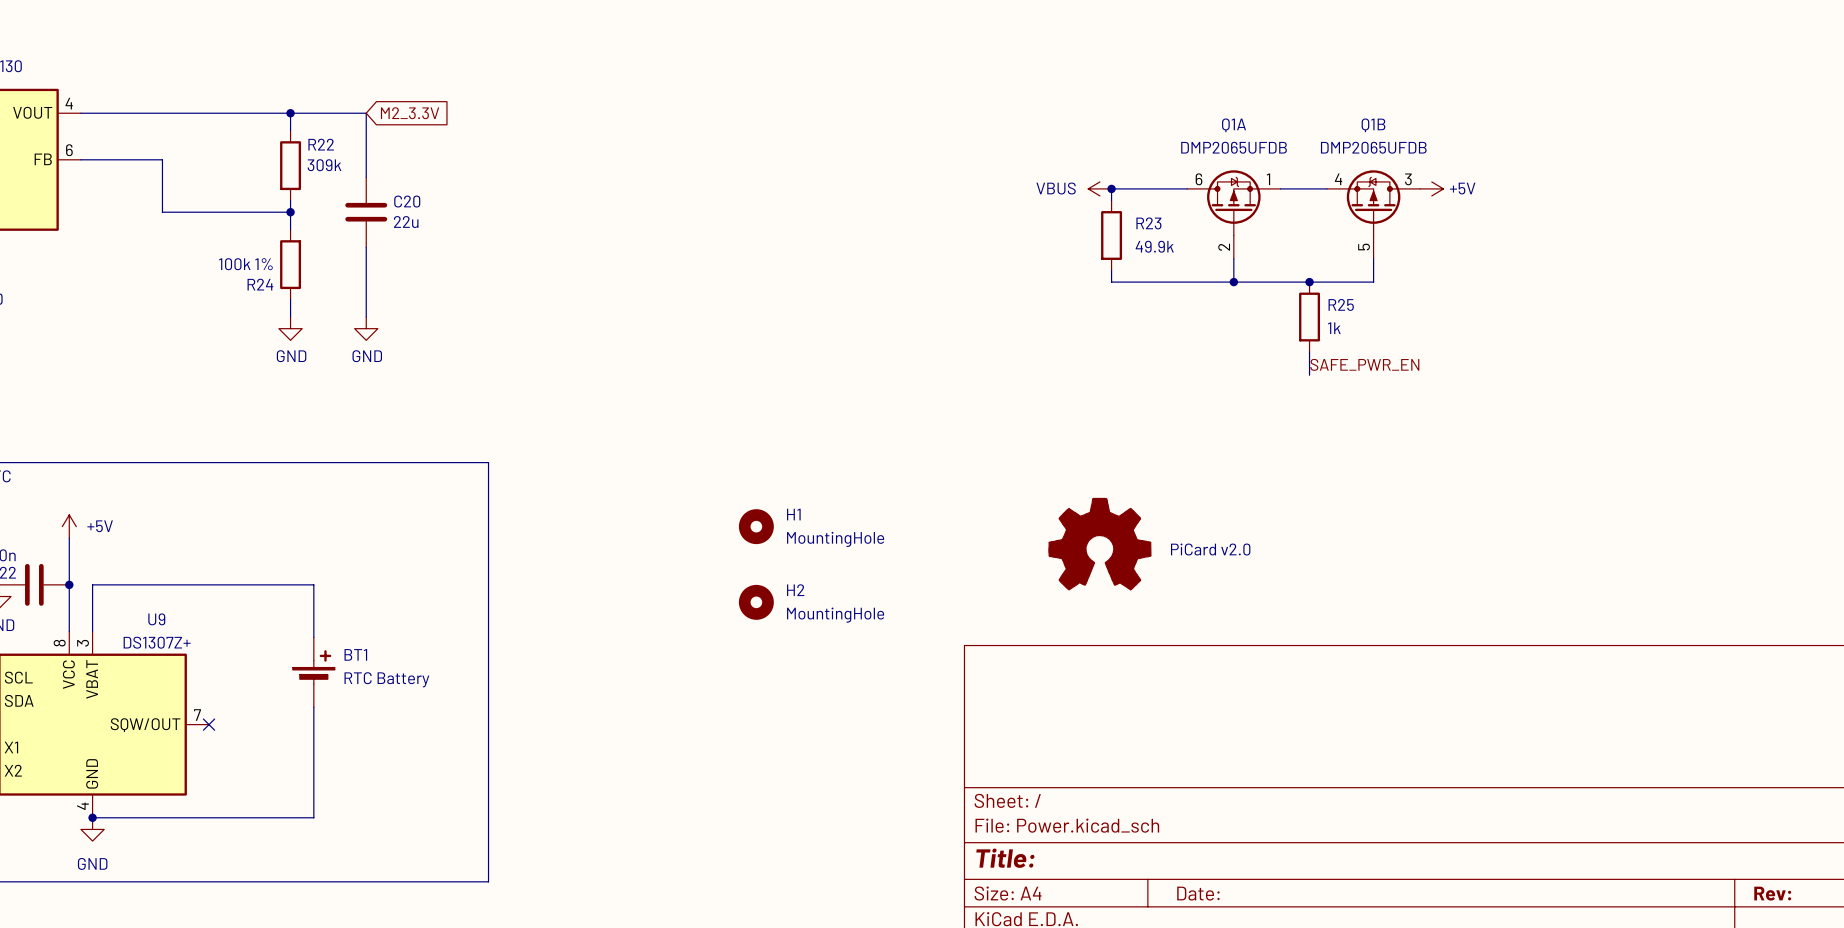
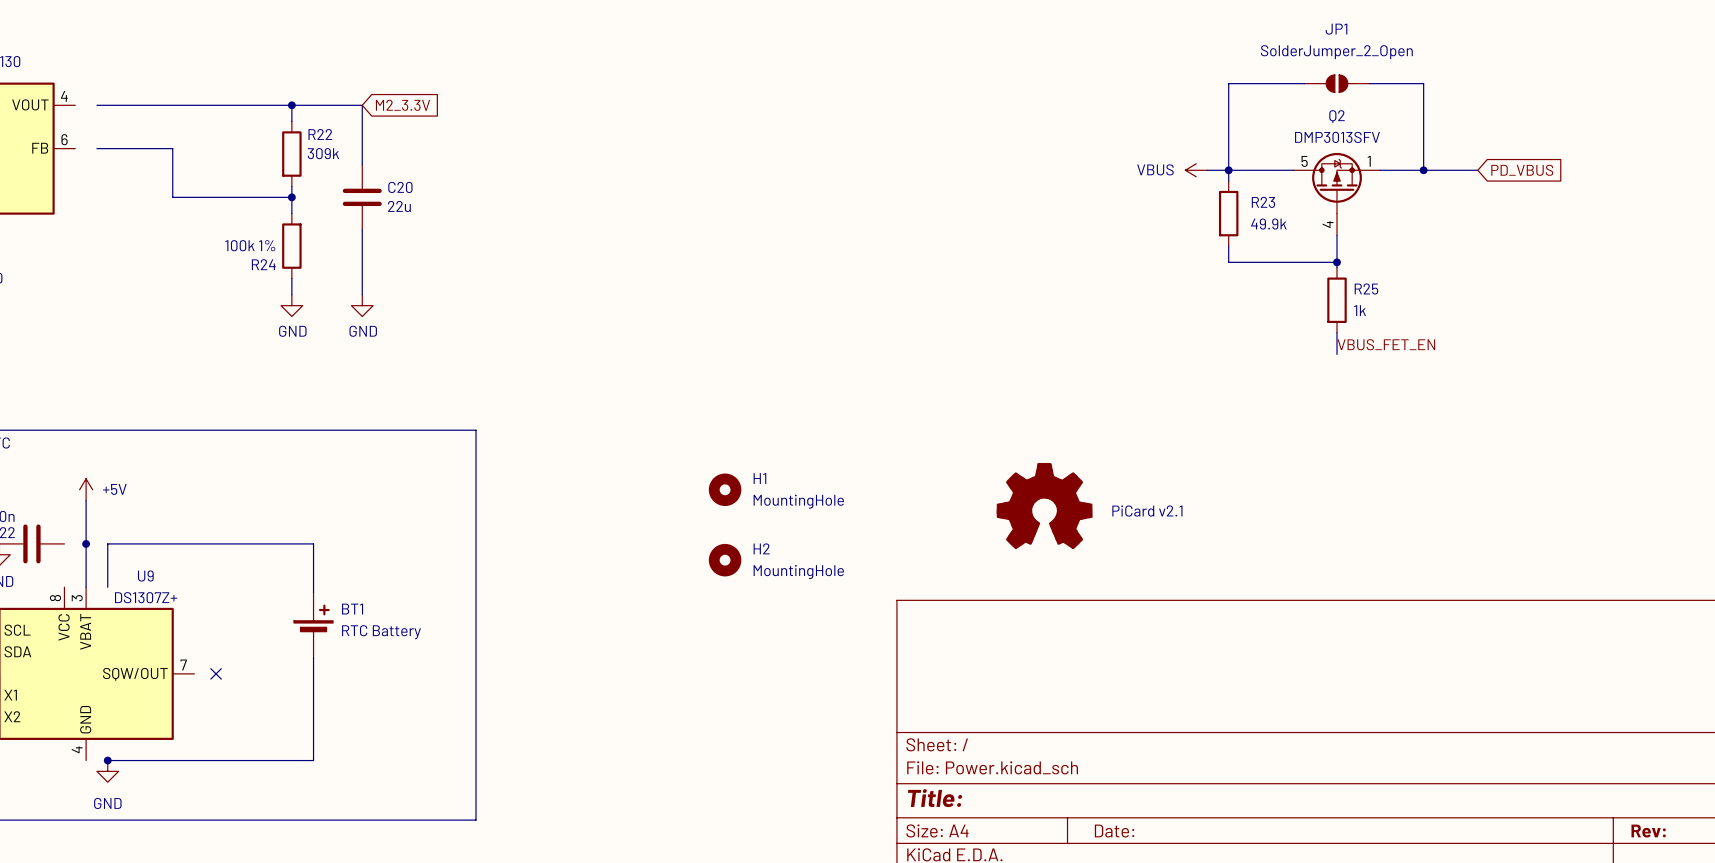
wire: none -> (1304, 83) (1228, 83) (1228, 181)
JP1: none -> SolderJumper_2_Open (1337, 83)
wire: none -> (1369, 83) (1423, 83) (1423, 170)
wire: (80, 113) (104, 113) -> none
wire: (290, 113) (290, 130) -> (291, 105) (291, 121)
junction position: (290, 113) -> (291, 105)
wire: (366, 113) (366, 177) -> (340, 105) (362, 105) (362, 164)
global label position: M2_3.3V (410, 113) -> M2_3.3V (403, 105)
wire: (80, 159) (104, 159) -> (270, 197) (291, 197)
wire: (162, 159) (162, 212) (185, 212) -> (151, 148) (172, 148) (172, 197)
R22 position: (290, 165) -> (291, 154)
wire: none -> (1207, 170) (1293, 170)
junction: none -> (1228, 170)
wire: none -> (1380, 170) (1477, 170)
junction: none -> (1423, 170)
global label: none -> PD_VBUS (1522, 170)
power symbol position: VBUS (1099, 188) -> VBUS (1196, 170)
junction: (1111, 188) -> none
wire: (1187, 188) (1111, 188) (1111, 200) -> none
wire: (1280, 188) (1327, 188) -> none
power symbol: +5V (1431, 188) -> none
wire: (290, 200) (290, 229) -> (291, 186) (291, 213)
Q2: none -> DMP3013SFV (1337, 194)
junction position: (290, 212) -> (291, 197)
C20 position: (366, 212) -> (362, 197)
Q1A: DMP2065UFDB (1233, 214) -> none
Q1B: DMP2065UFDB (1373, 214) -> none
R23 position: (1111, 235) -> (1228, 213)
wire: (366, 247) (366, 317) -> (362, 229) (362, 294)
wire: none -> (1337, 235) (1337, 267)
wire: (1233, 258) (1233, 282) -> none
wire: (1373, 258) (1373, 282) -> (1337, 262) (1277, 262)
R24 position: (290, 264) -> (291, 246)
wire: (1111, 270) (1111, 282) (1321, 282) -> (1228, 246) (1228, 262)
junction: (1233, 282) -> none
junction: (1309, 282) -> none
junction: none -> (1337, 262)
wire: (290, 299) (290, 317) -> (291, 278) (291, 294)
R25 position: (1309, 317) -> (1337, 300)
power symbol position: GND (290, 328) -> GND (291, 305)
power symbol position: GND (366, 328) -> GND (362, 305)
wire: (1309, 351) (1309, 375) -> (1337, 332) (1337, 354)
label: SAFE_PWR_EN (1364, 364) -> none
label: none -> VBUS_FET_EN (1386, 344)
line: (488, 462) (488, 881) -> (454, 430) (475, 430) (475, 820) (454, 820)
power symbol position: +5V (69, 526) -> +5V (86, 489)
H1 position: (756, 526) -> (725, 489)
wire: (69, 538) (69, 631) -> none
part: PiCard v2.0 (1099, 544) -> none
part: none -> PiCard v2.1 (1044, 506)
junction position: (69, 584) -> (86, 543)
wire: (92, 584) (115, 584) -> (86, 543) (86, 500)
wire: none -> (107, 543) (107, 587)
wire: (313, 584) (313, 637) -> (291, 543) (313, 543) (313, 592)
H2 position: (756, 602) -> (725, 560)
BT1 position: (313, 672) -> (313, 625)
wire: (313, 707) (313, 817) -> (313, 657) (313, 760) (291, 760)
no-connect mark position: (209, 724) -> (216, 673)
wire: (92, 817) (115, 817) -> none
junction position: (92, 817) -> (107, 760)
power symbol position: GND (92, 829) -> GND (107, 771)

